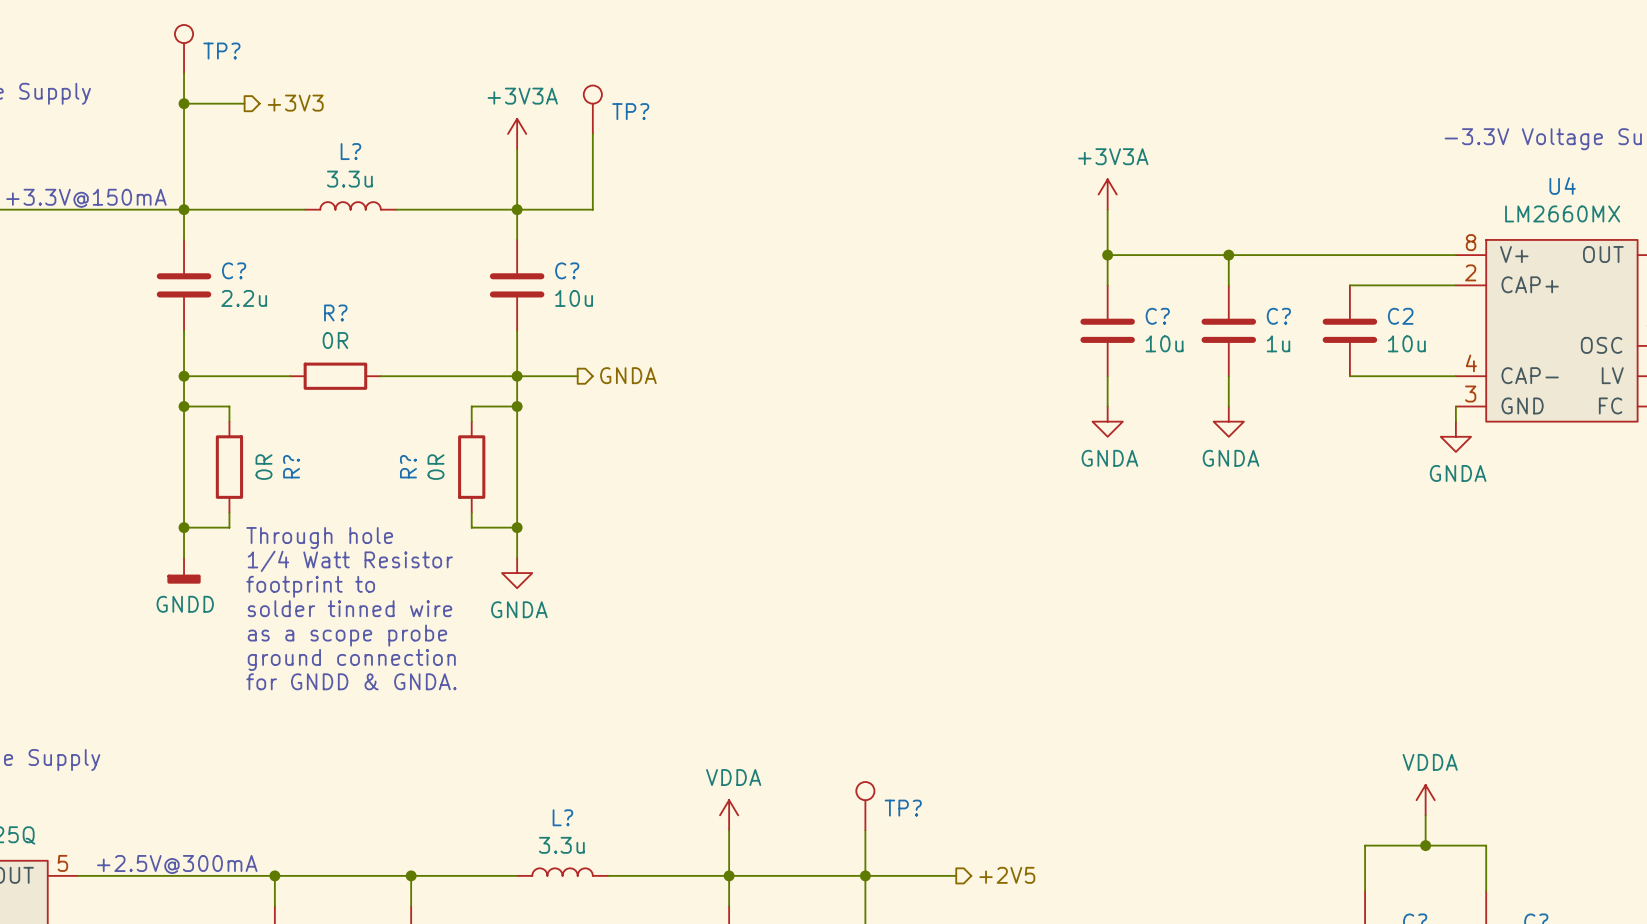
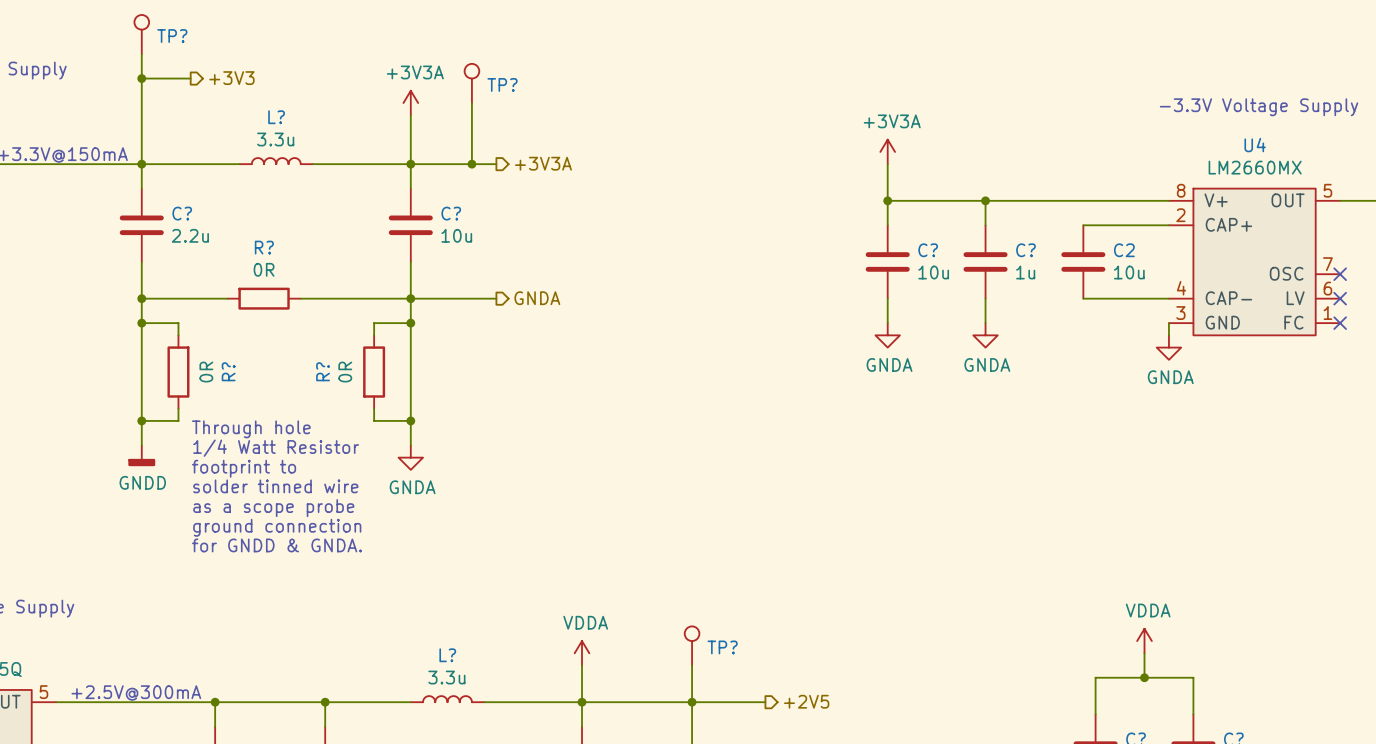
wire: none -> (471, 164) (496, 164)
junction: none -> (471, 164)
hierarchical label: none -> +3V3A (543, 163)
hierarchical label position: GNDA (628, 375) -> GNDA (537, 298)
wire: none -> (459, 298) (496, 298)

